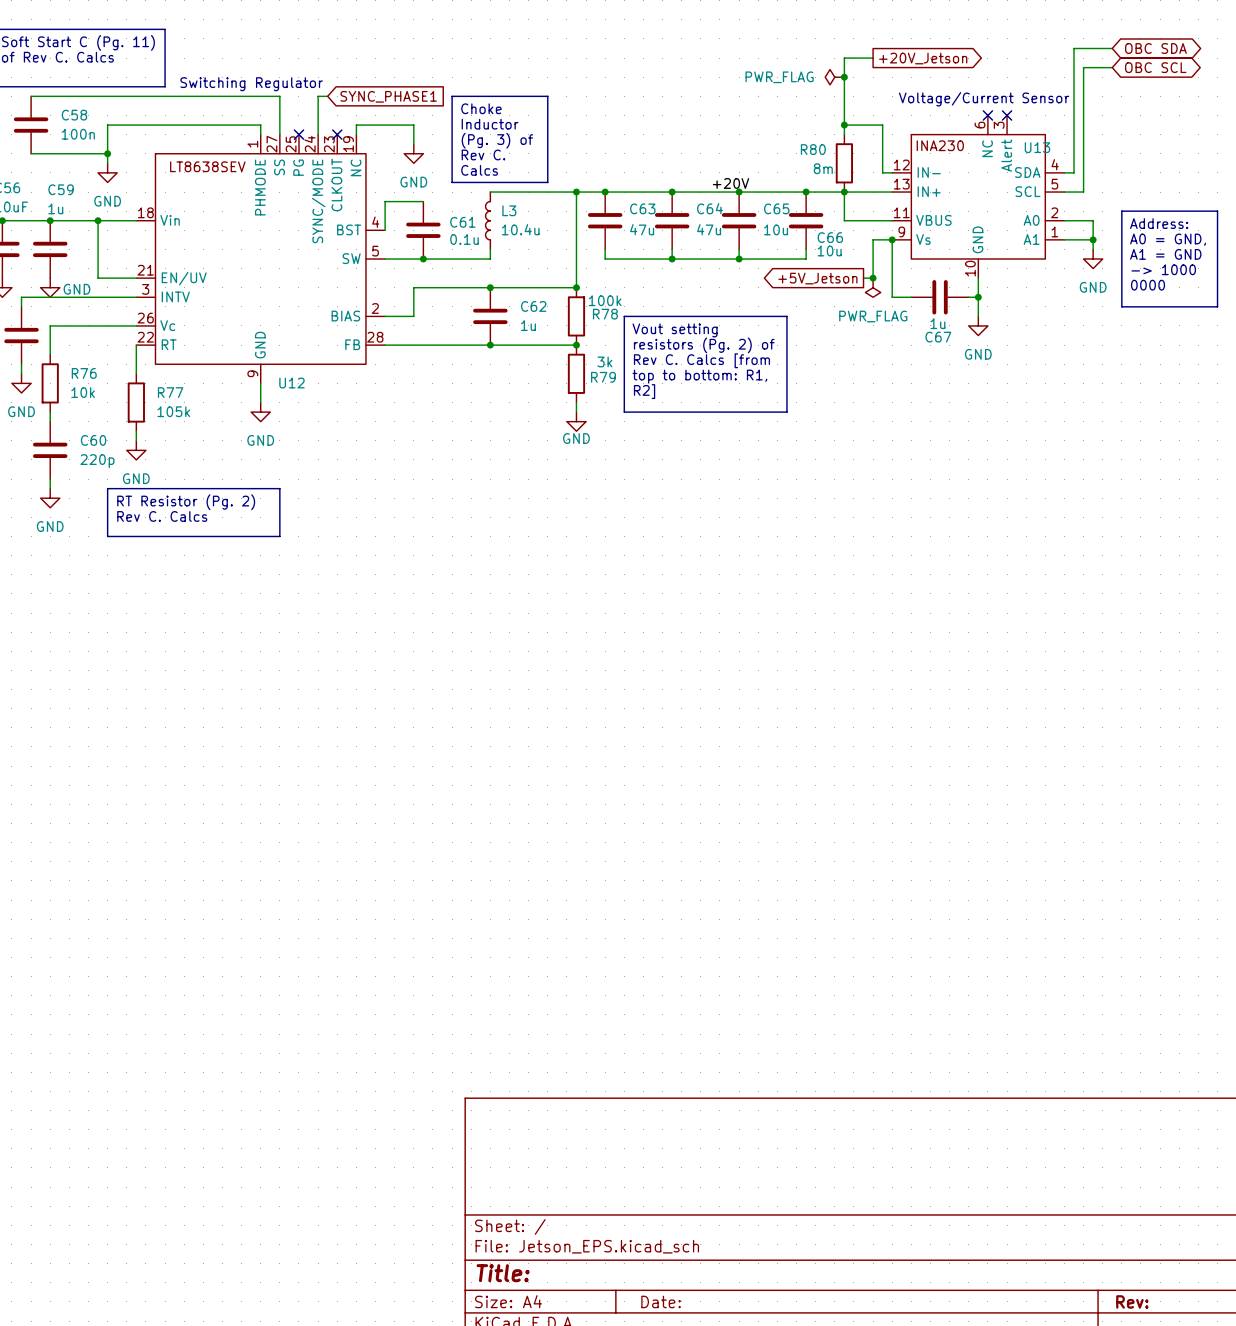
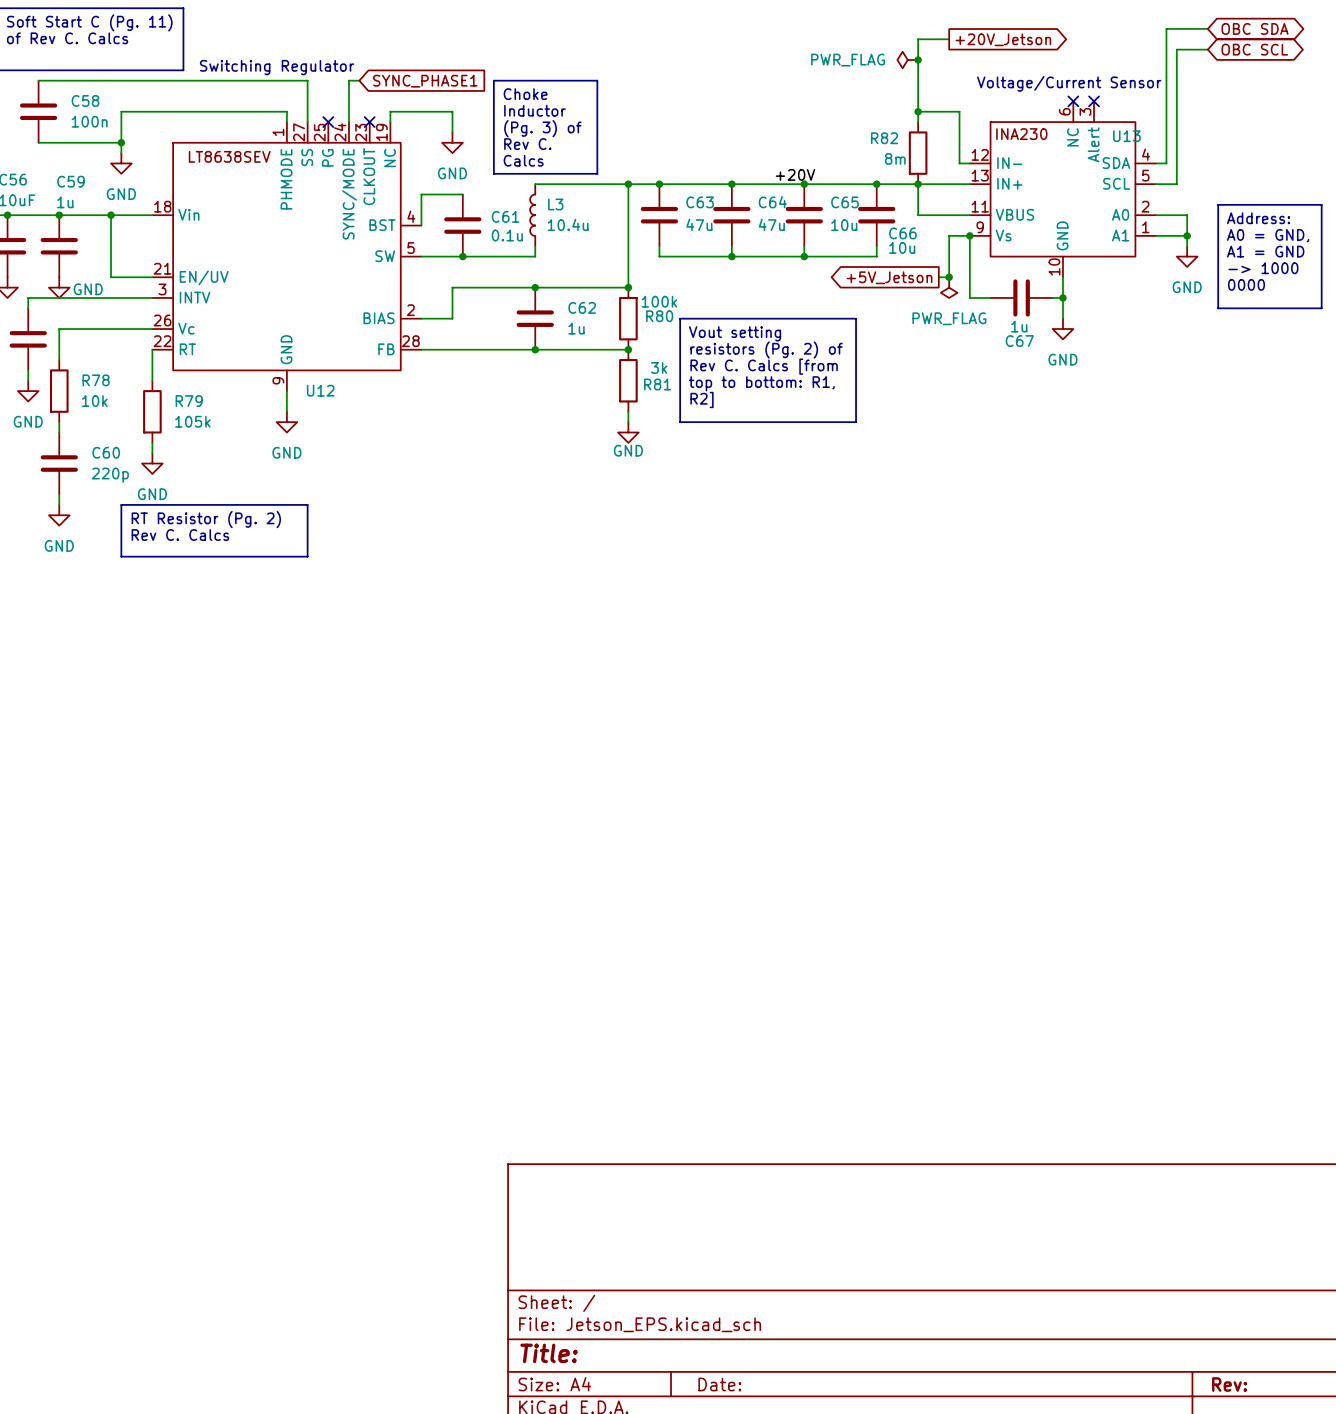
R80 name: R80 (813, 149) -> R82 (884, 138)
R78 name: R78 (605, 314) -> R80 (659, 316)
R76 name: R76 (84, 373) -> R78 (96, 380)
R79 name: R79 (603, 377) -> R81 (657, 384)
R77 name: R77 (170, 392) -> R79 (189, 401)

